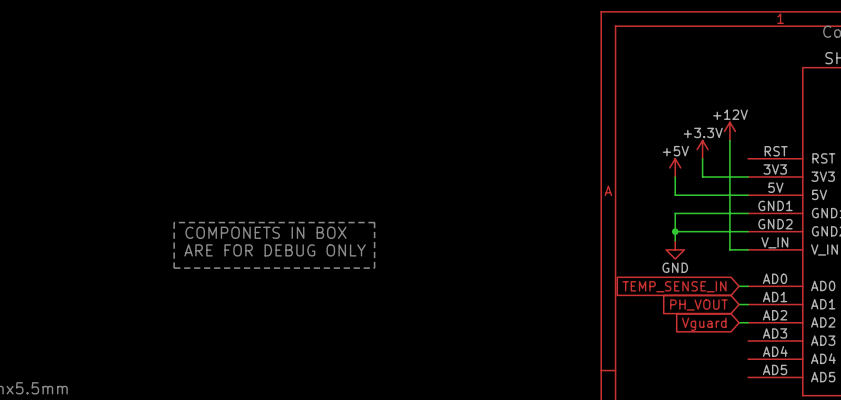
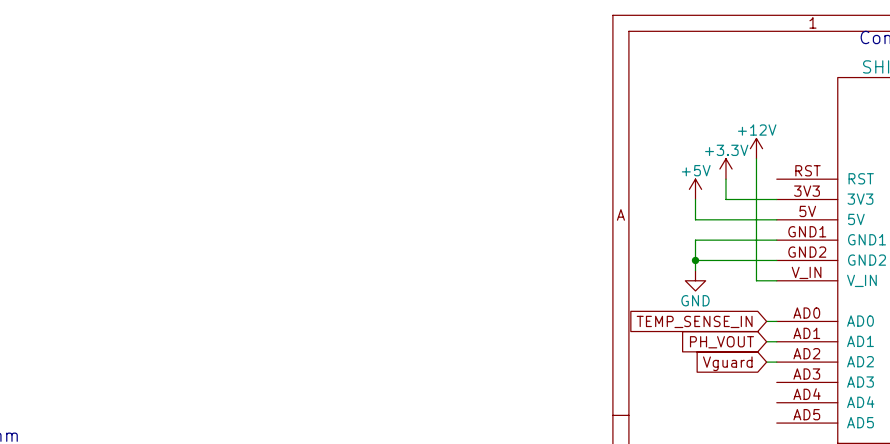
line: (174, 222) (174, 268) (374, 268) (374, 222) (174, 222) -> none
text: COMPONETS IN BOX (265, 232) -> none
text: ARE FOR DEBUG ONLY (275, 250) -> none

